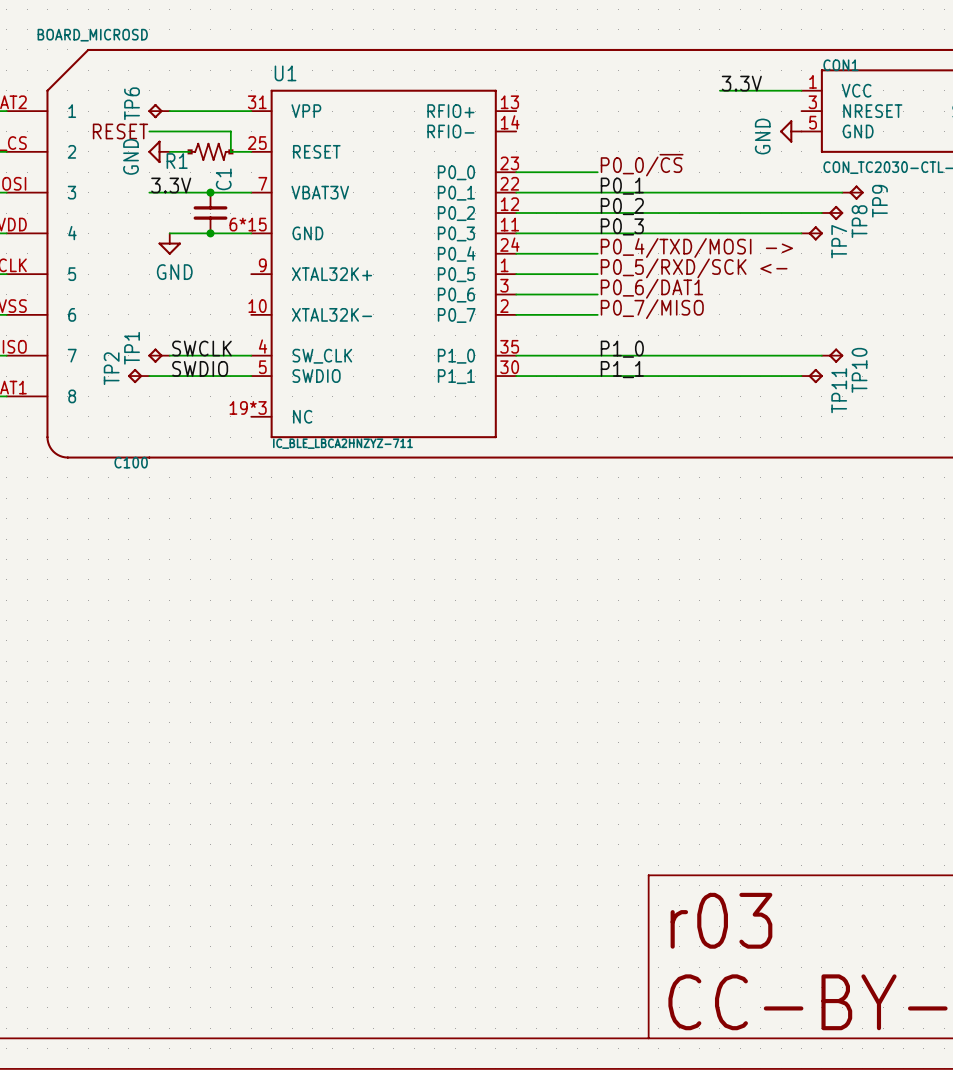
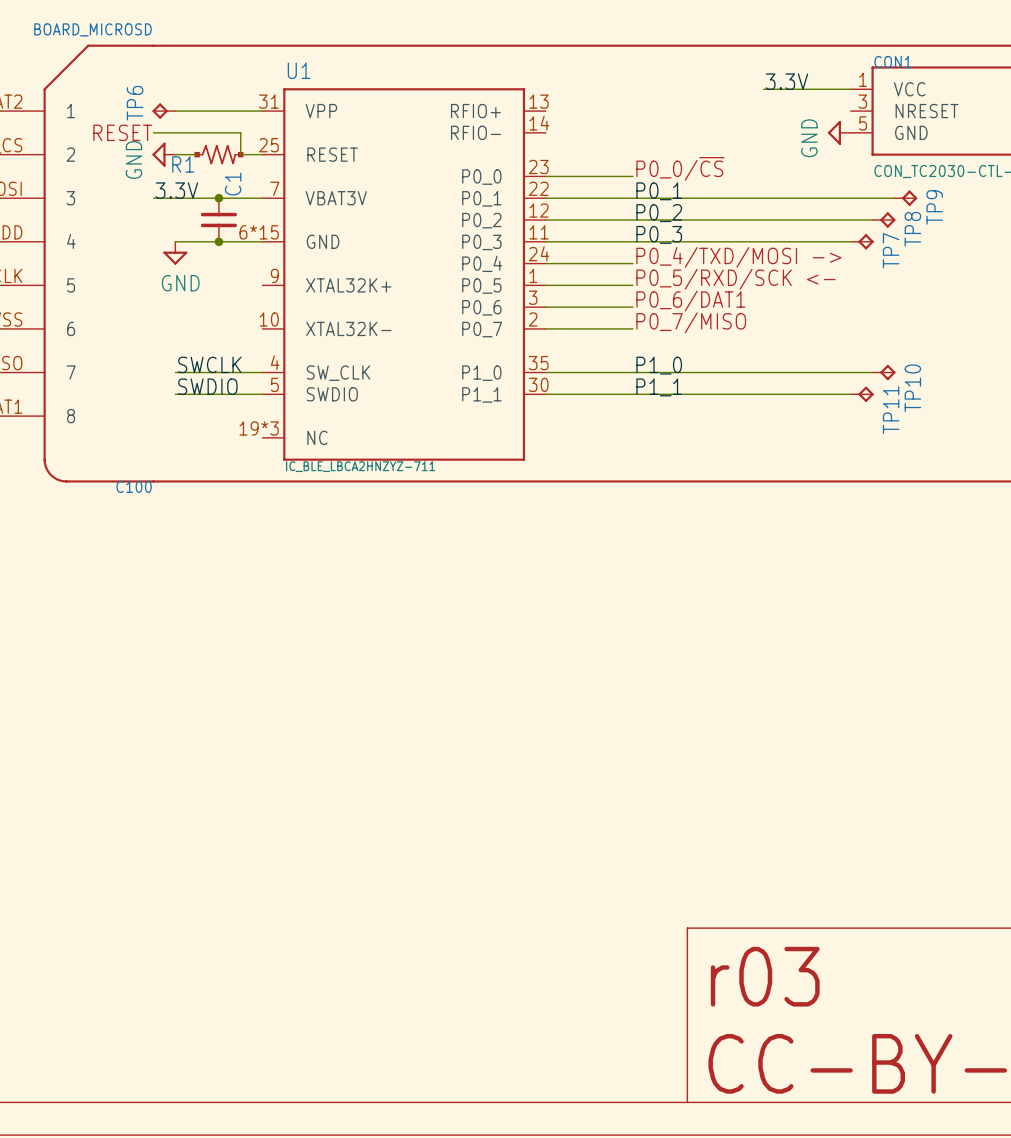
TP1: (159, 355) -> none
TP2: (138, 376) -> none
wire: (149, 376) (169, 376) -> none

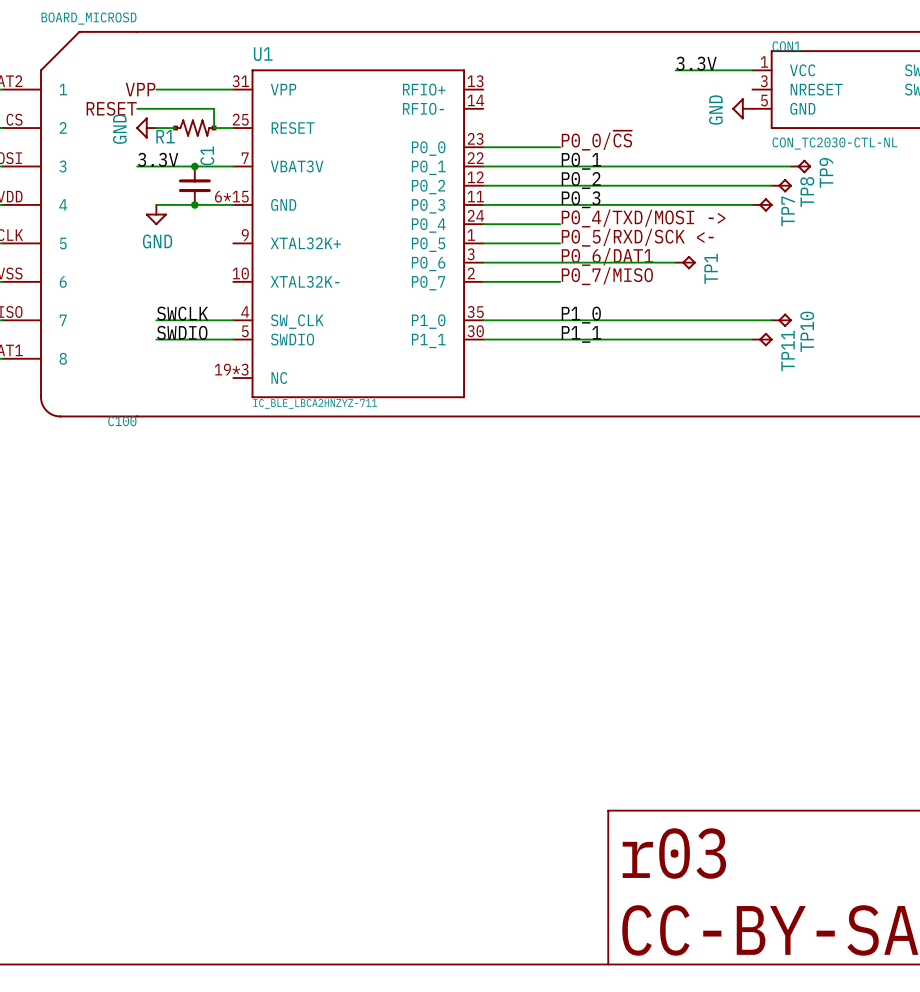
text: none -> VPP (140, 89)
TP6: (163, 111) -> none
wire: none -> (560, 262) (675, 262)
TP1: none -> (685, 262)

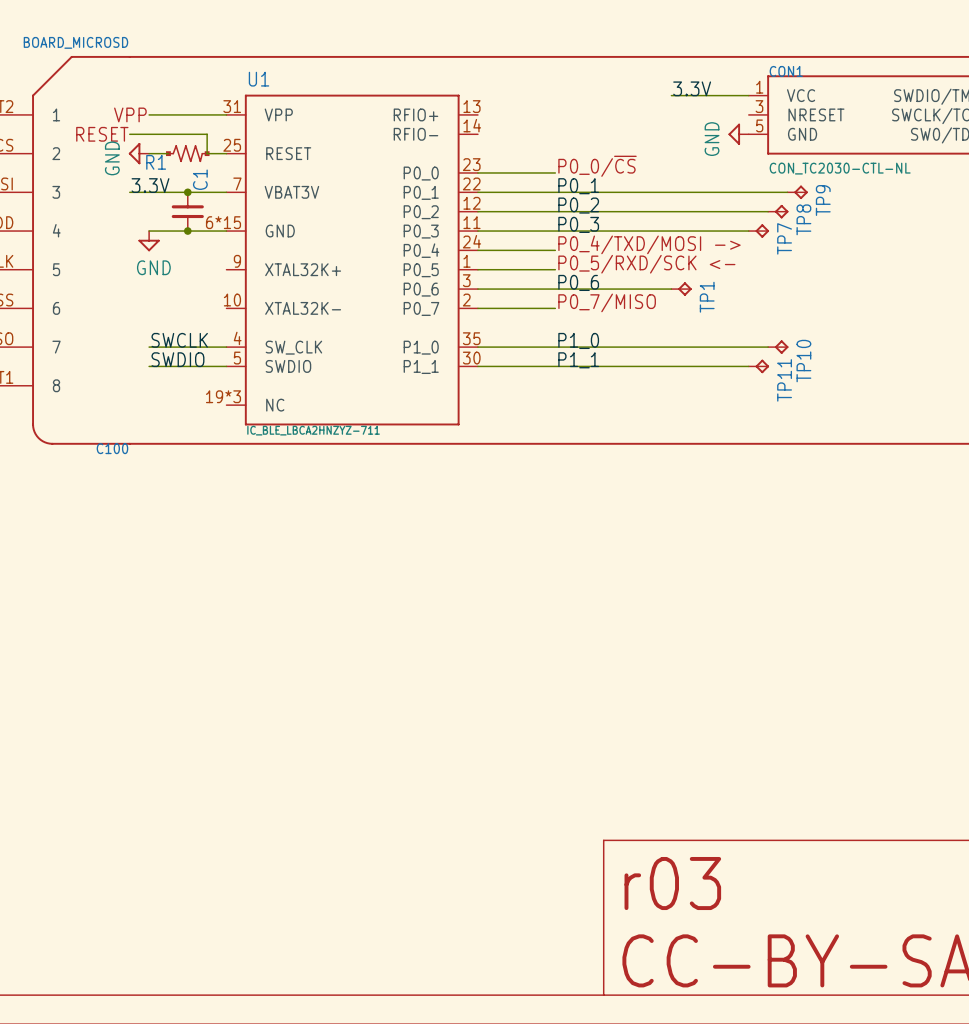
text: P0_6/DAT1 (607, 256) -> none
label: none -> P0_6 (578, 282)

